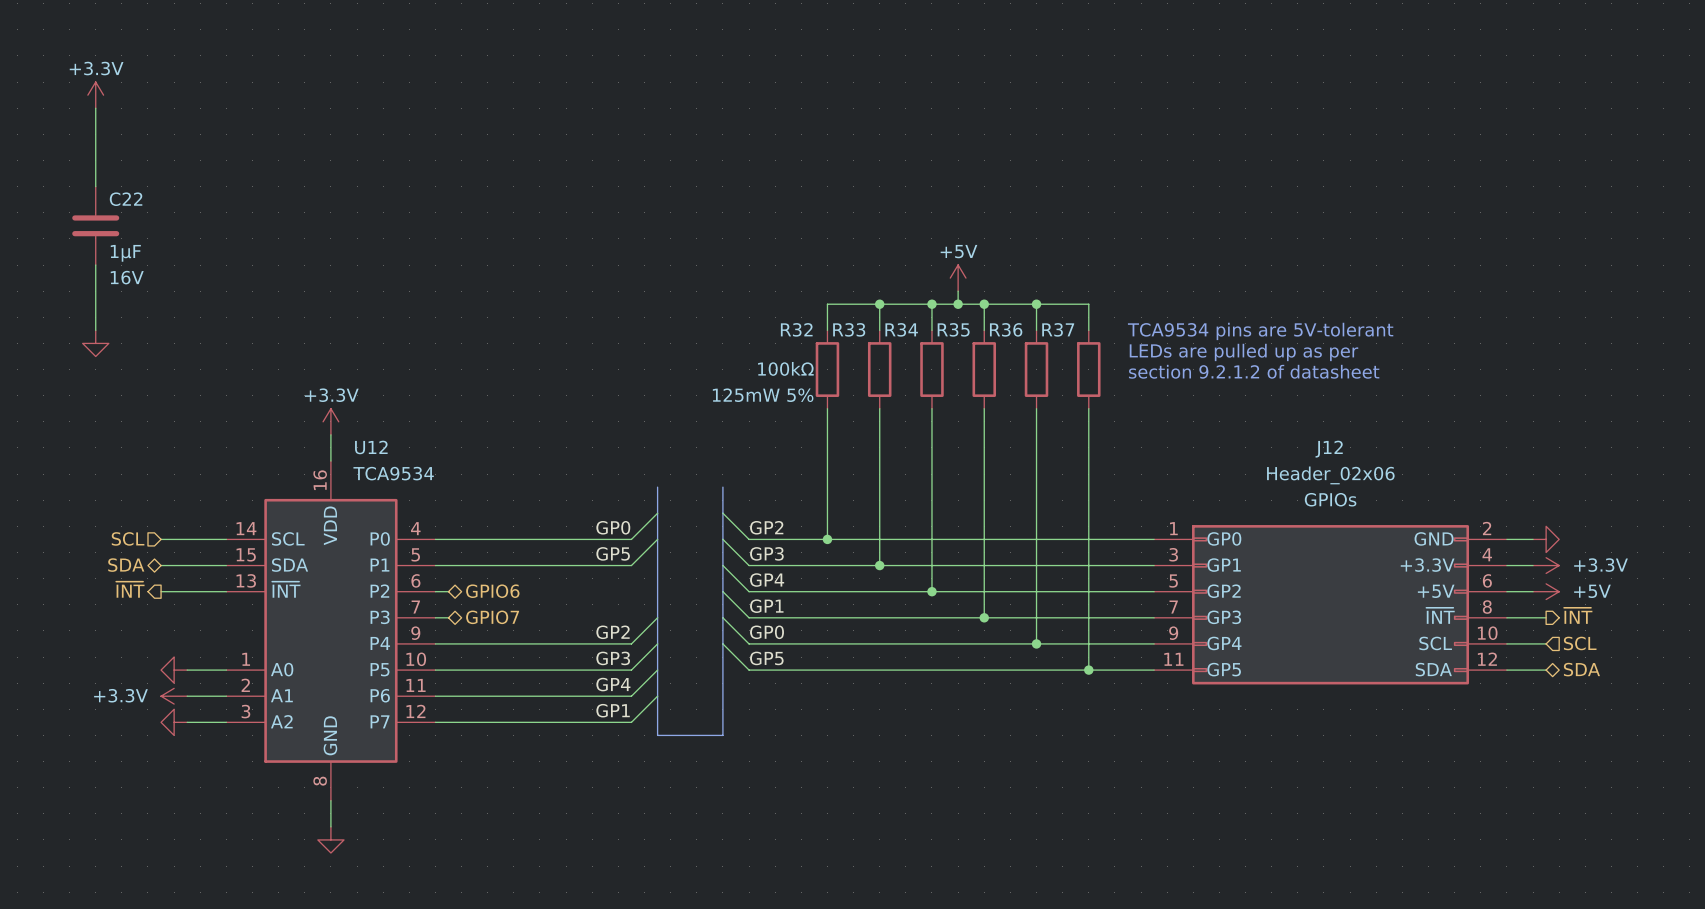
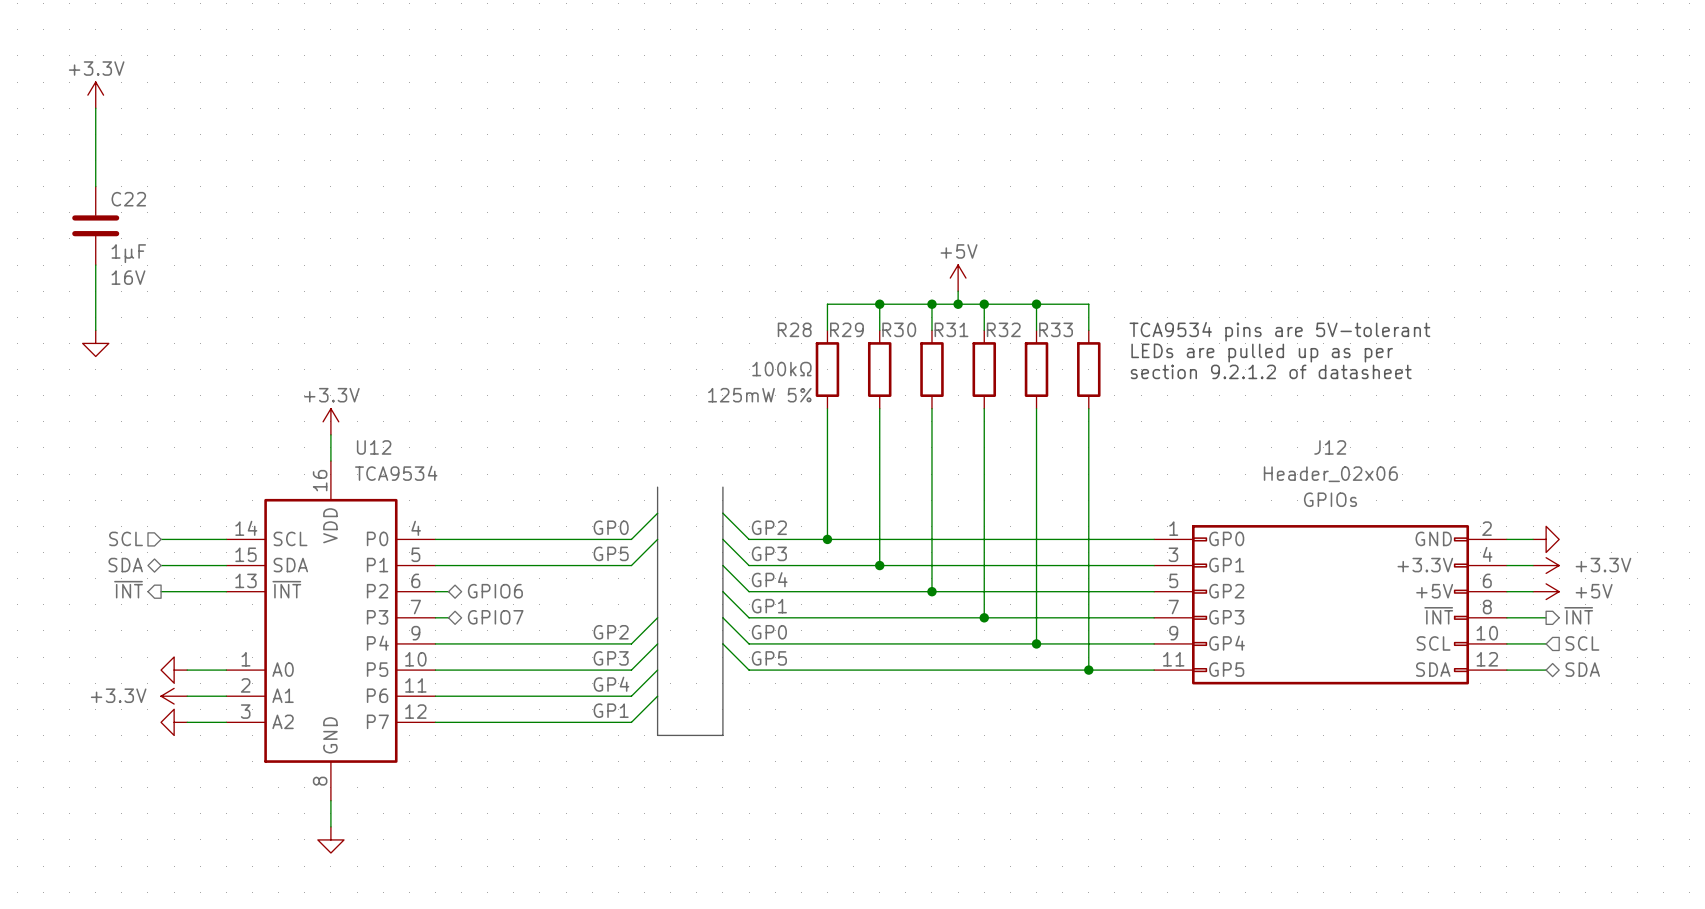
R32 name: R32 (796, 329) -> R28 (794, 329)
R33 name: R33 (849, 329) -> R29 (846, 329)
R34 name: R34 (901, 329) -> R30 (899, 329)
R35 name: R35 (953, 329) -> R31 (951, 329)
R36 name: R36 (1006, 329) -> R32 (1003, 329)
R37 name: R37 (1058, 329) -> R33 (1056, 329)

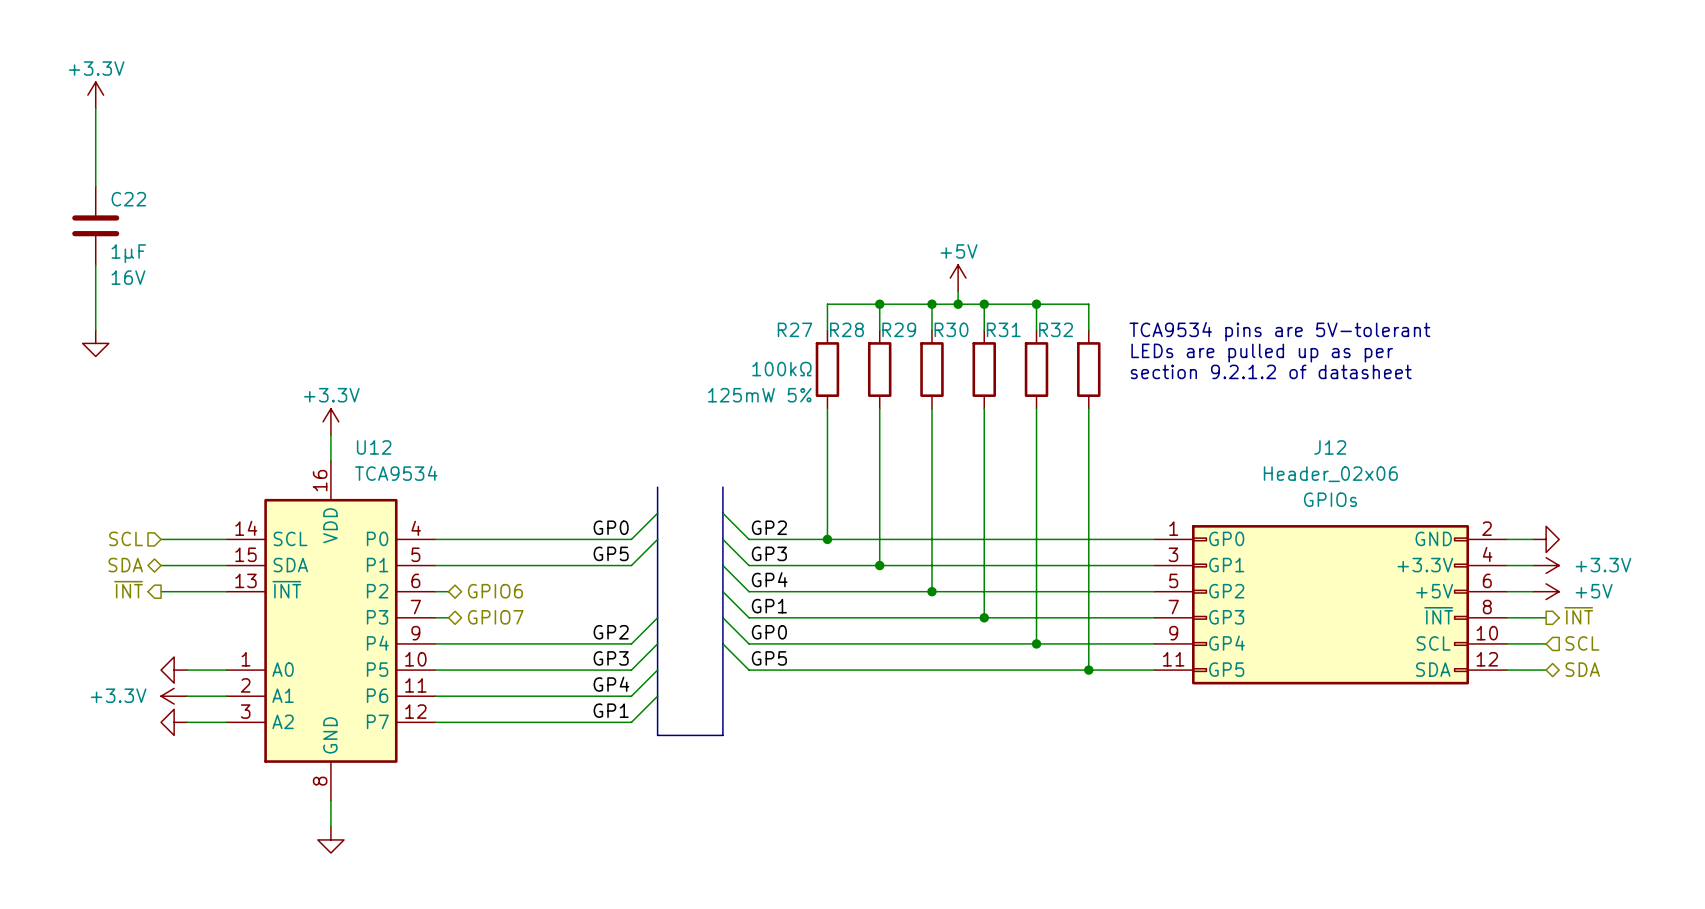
R28 name: R28 (794, 329) -> R27 (795, 329)
R29 name: R29 (846, 329) -> R28 (846, 329)
R30 name: R30 (899, 329) -> R29 (899, 329)
R31 name: R31 (951, 329) -> R30 (951, 329)
R32 name: R32 (1003, 329) -> R31 (1003, 329)
R33 name: R33 (1056, 329) -> R32 (1056, 329)

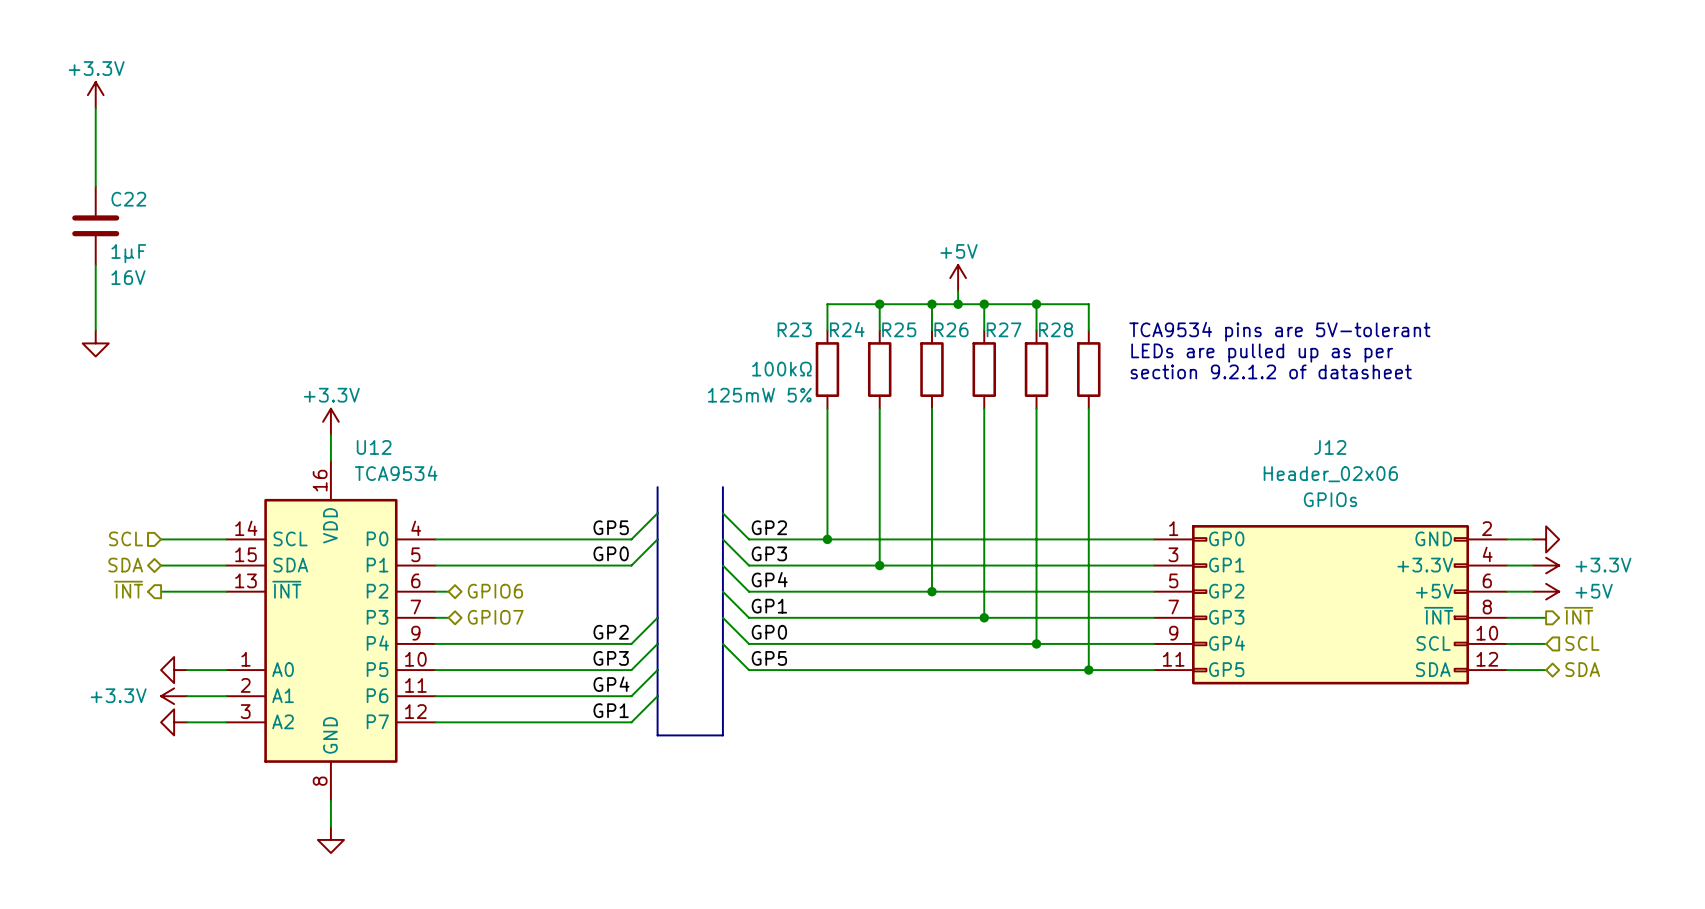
R27 name: R27 (795, 329) -> R23 (794, 329)
R28 name: R28 (846, 329) -> R24 (847, 329)
R29 name: R29 (899, 329) -> R25 (899, 329)
R30 name: R30 (951, 329) -> R26 (951, 329)
R31 name: R31 (1003, 329) -> R27 (1004, 329)
R32 name: R32 (1056, 329) -> R28 (1056, 329)
label: GP0 (611, 527) -> GP5 (611, 527)
label: GP5 (611, 553) -> GP0 (611, 553)

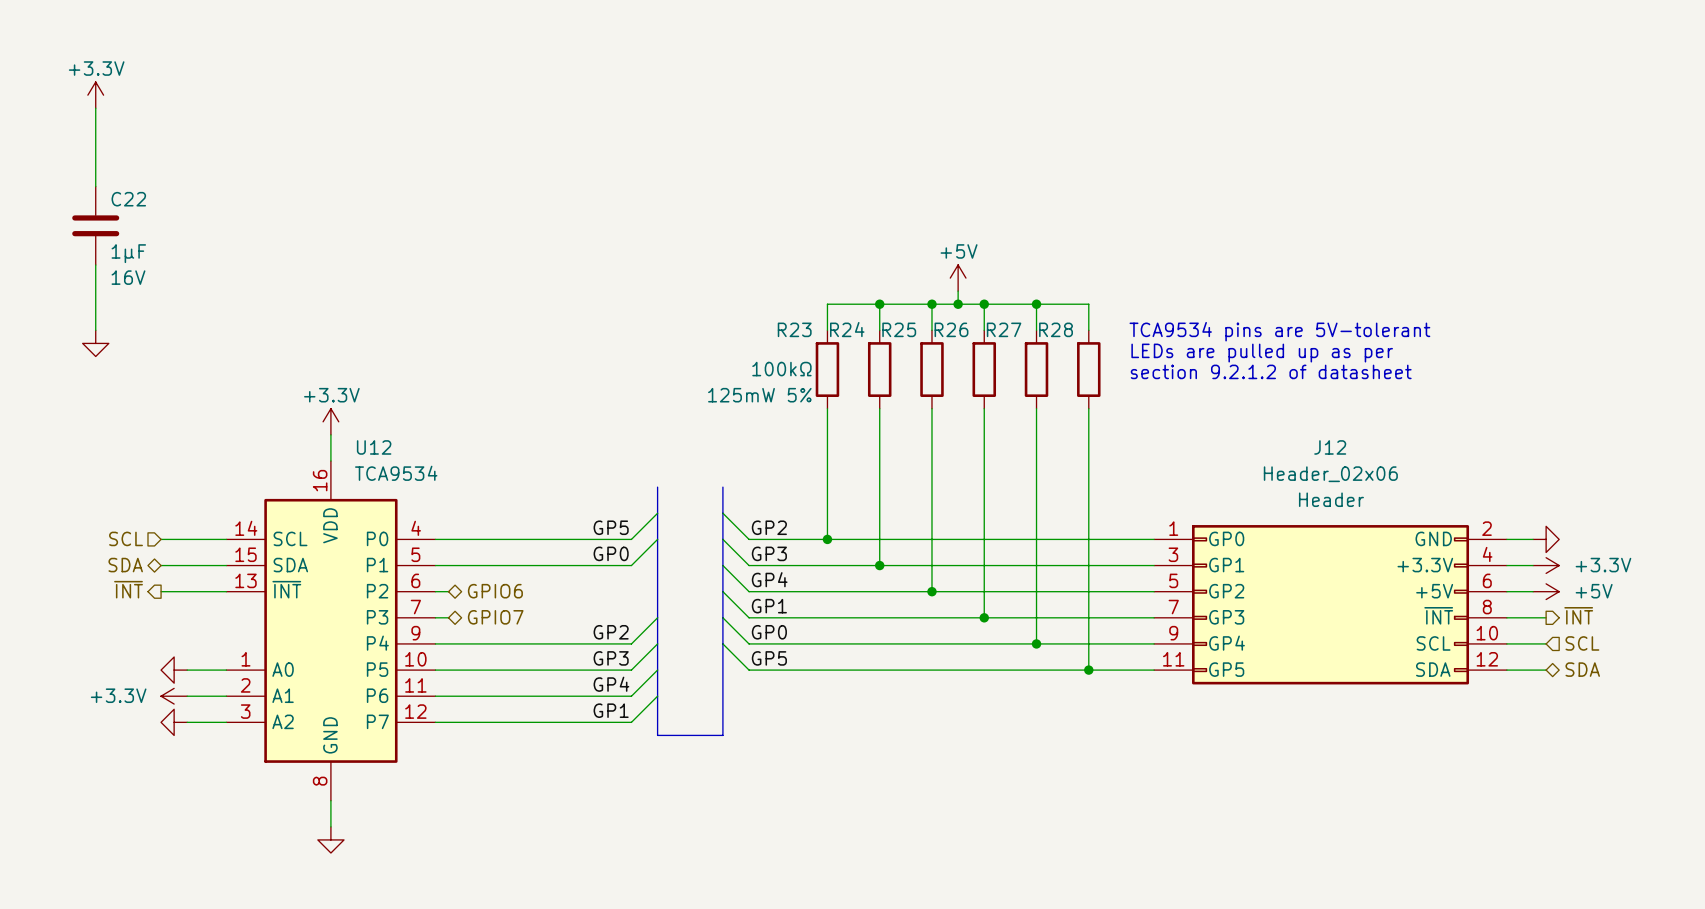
J12 text: GPIOs (1330, 499) -> Header (1331, 499)

